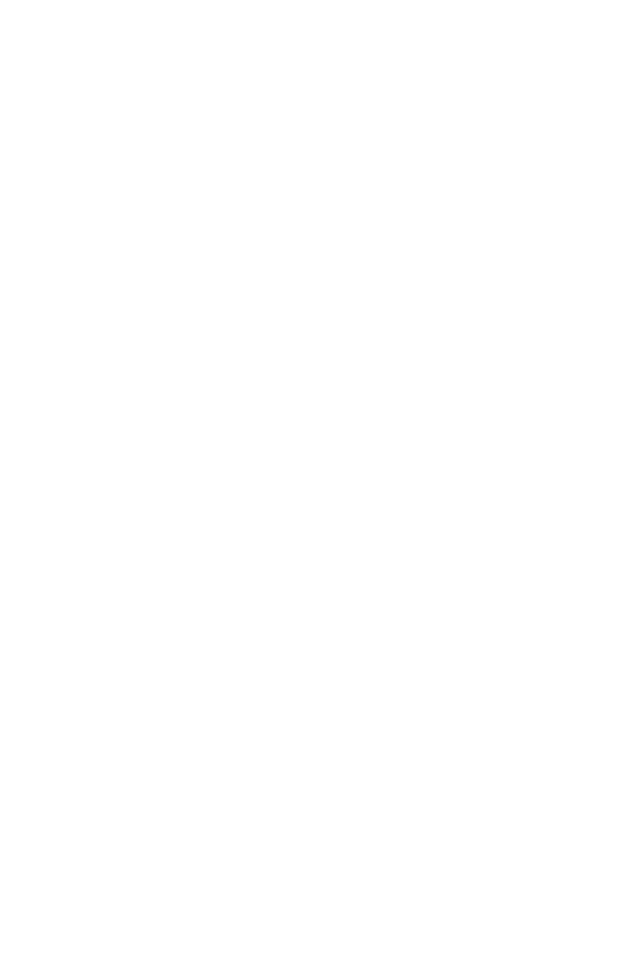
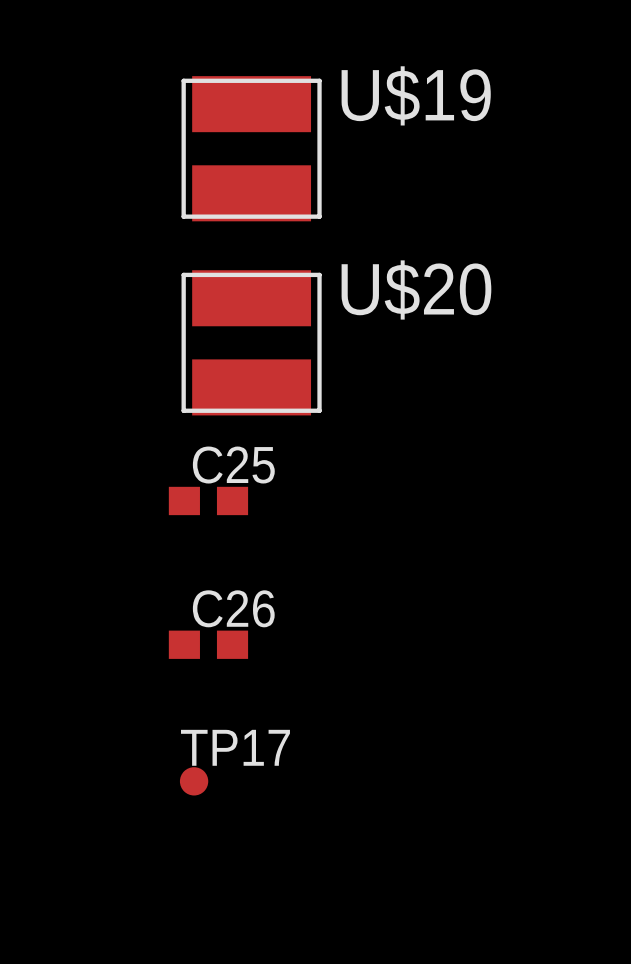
U$19: none -> (251, 148)
U$20: none -> (251, 342)
C25: none -> (208, 500)
C26: none -> (208, 644)
TP17: none -> (194, 781)

